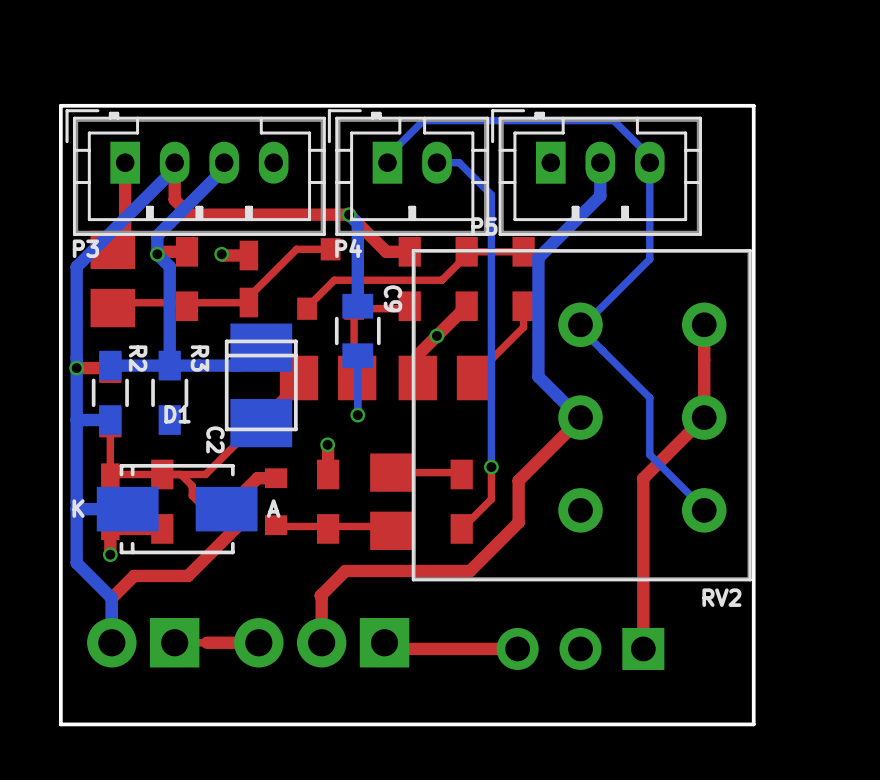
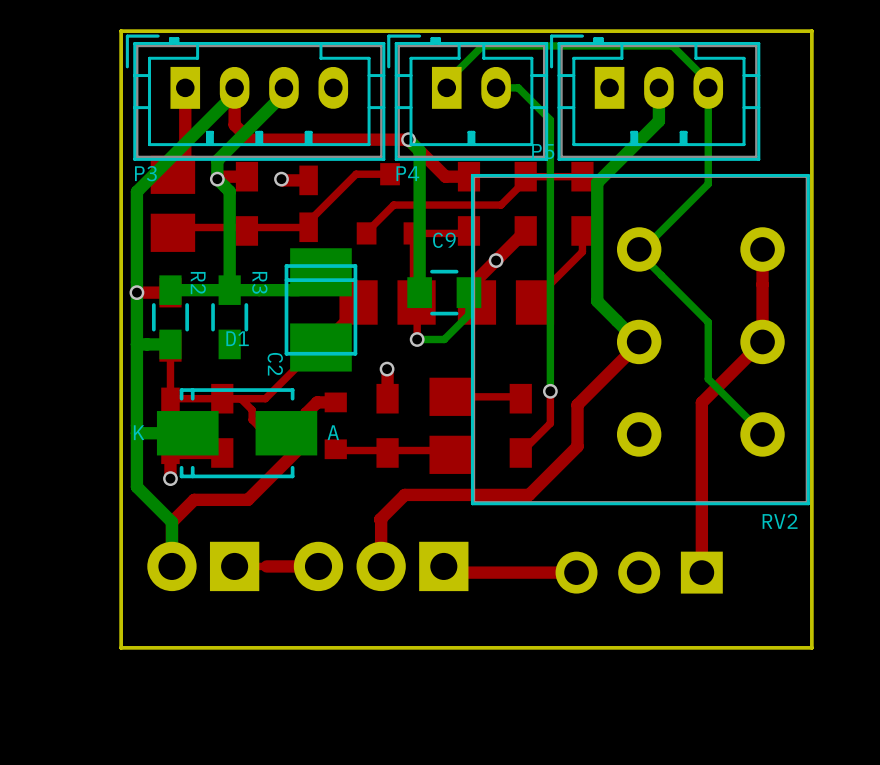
bottom track: (357, 223) (357, 306) -> (417, 148) (419, 150) (419, 292)
C9 rotation: 0° (357, 330) -> 90° clockwise (444, 292)
C9 position: (357, 330) -> (444, 292)
bottom track: (357, 355) (357, 415) -> (468, 292) (468, 314) (444, 339) (417, 339)

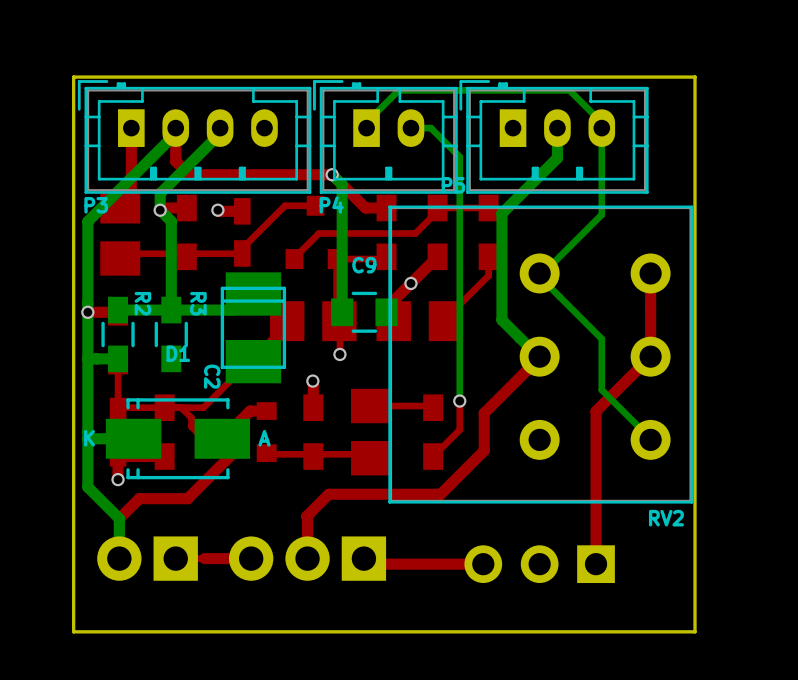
bottom track: (468, 292) (468, 314) (444, 339) (417, 339) -> none

